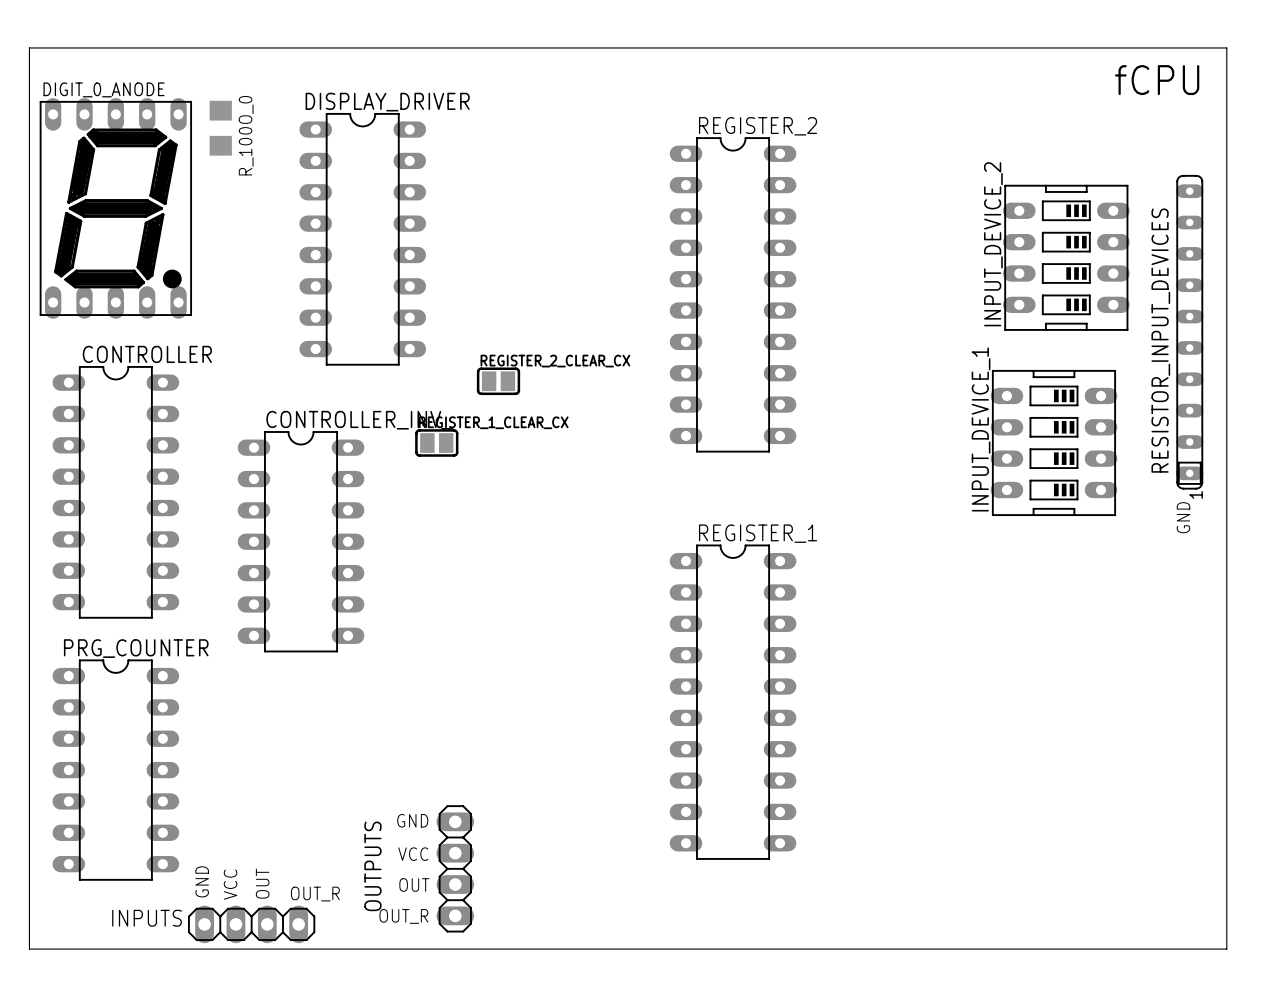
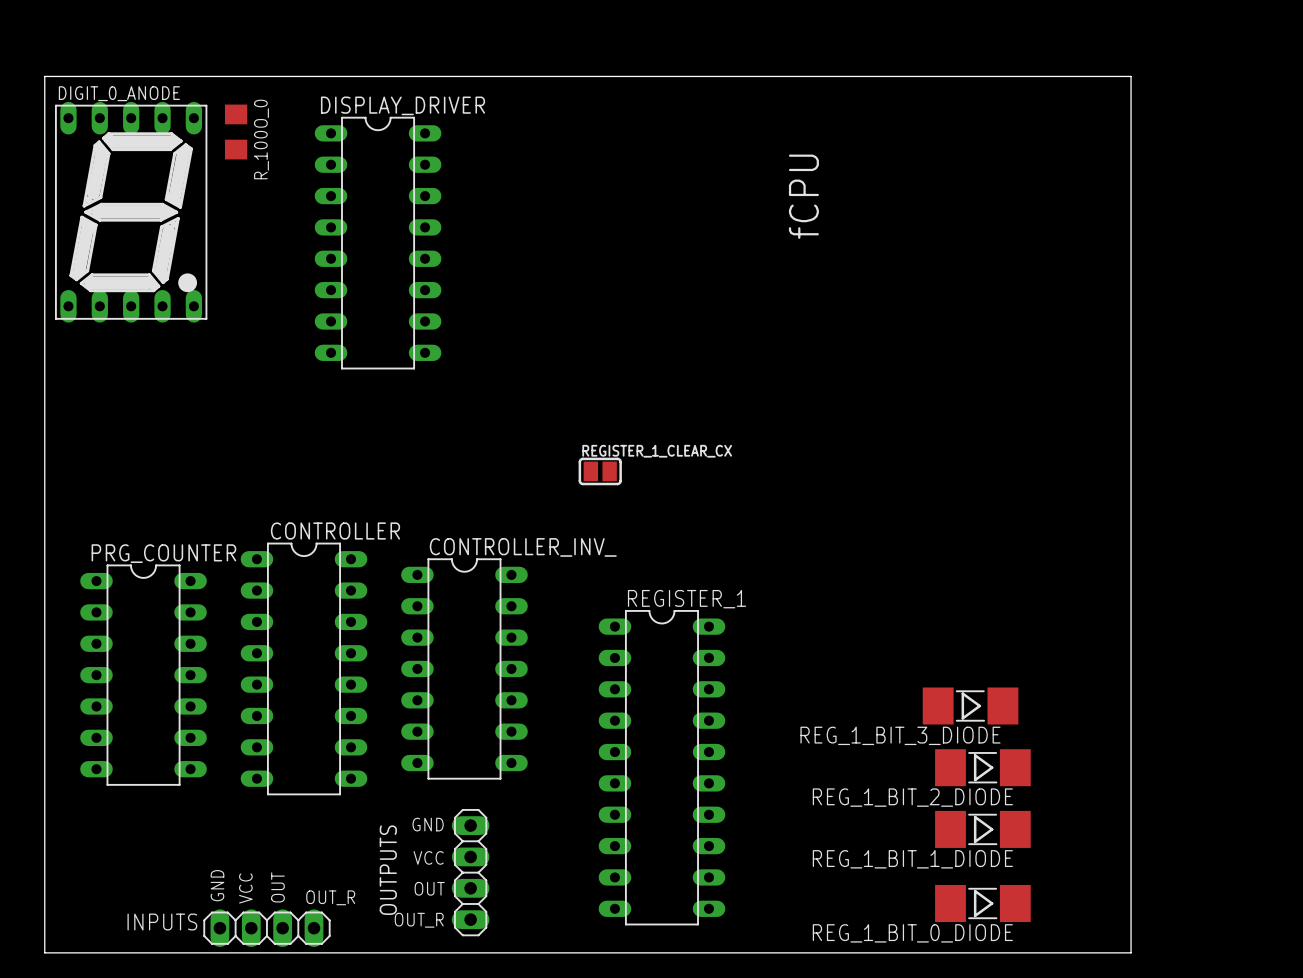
board edge: (29, 72) (29, 47) (1226, 47) (1226, 949) (1115, 949) -> (44, 76) (1131, 76) (1131, 952)
text: fCPU (1157, 80) -> none
text: none -> fCPU (803, 196)
INPUT_DEVICE_2: (1066, 257) -> none
REGISTER_2: (733, 294) -> none
RESISTOR_INPUT_DEVICES: (1189, 332) -> none
REGISTER_2_CLEAR_CX: (498, 381) -> none
REGISTER_1_CLEAR_CX position: (436, 442) -> (600, 471)
INPUT_DEVICE_1: (1053, 442) -> none
CONTROLLER position: (115, 492) -> (303, 668)
text: GND (1183, 517) -> none
CONTROLLER_INV_ position: (301, 541) -> (464, 668)
REGISTER_1 position: (733, 702) -> (661, 767)
REG_1_BIT_3_DIODE: none -> (970, 705)
REG_1_BIT_2_DIODE: none -> (982, 767)
PRG_COUNTER position: (115, 770) -> (143, 675)
REG_1_BIT_1_DIODE: none -> (982, 829)
REG_1_BIT_0_DIODE: none -> (982, 903)

